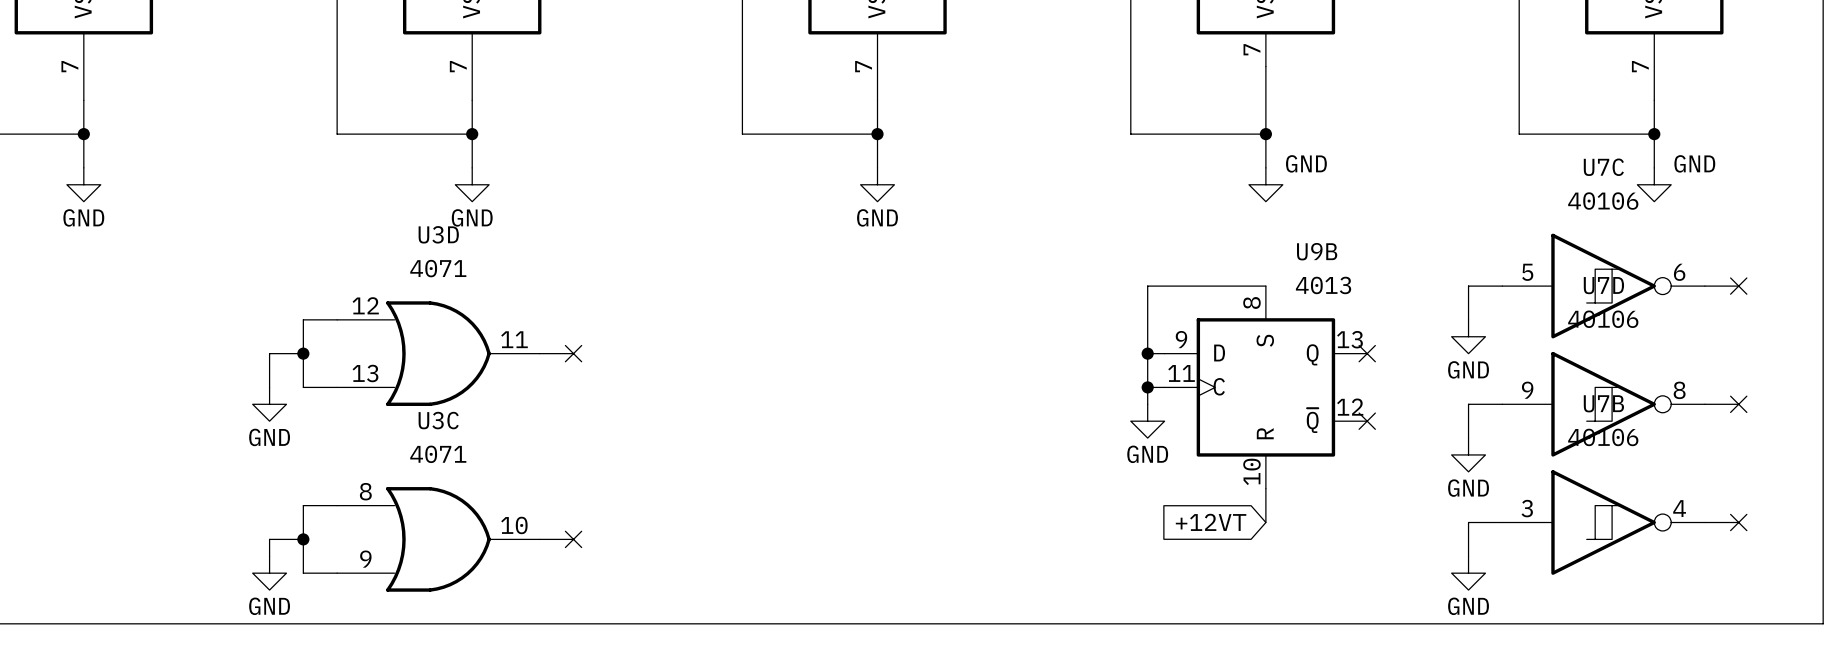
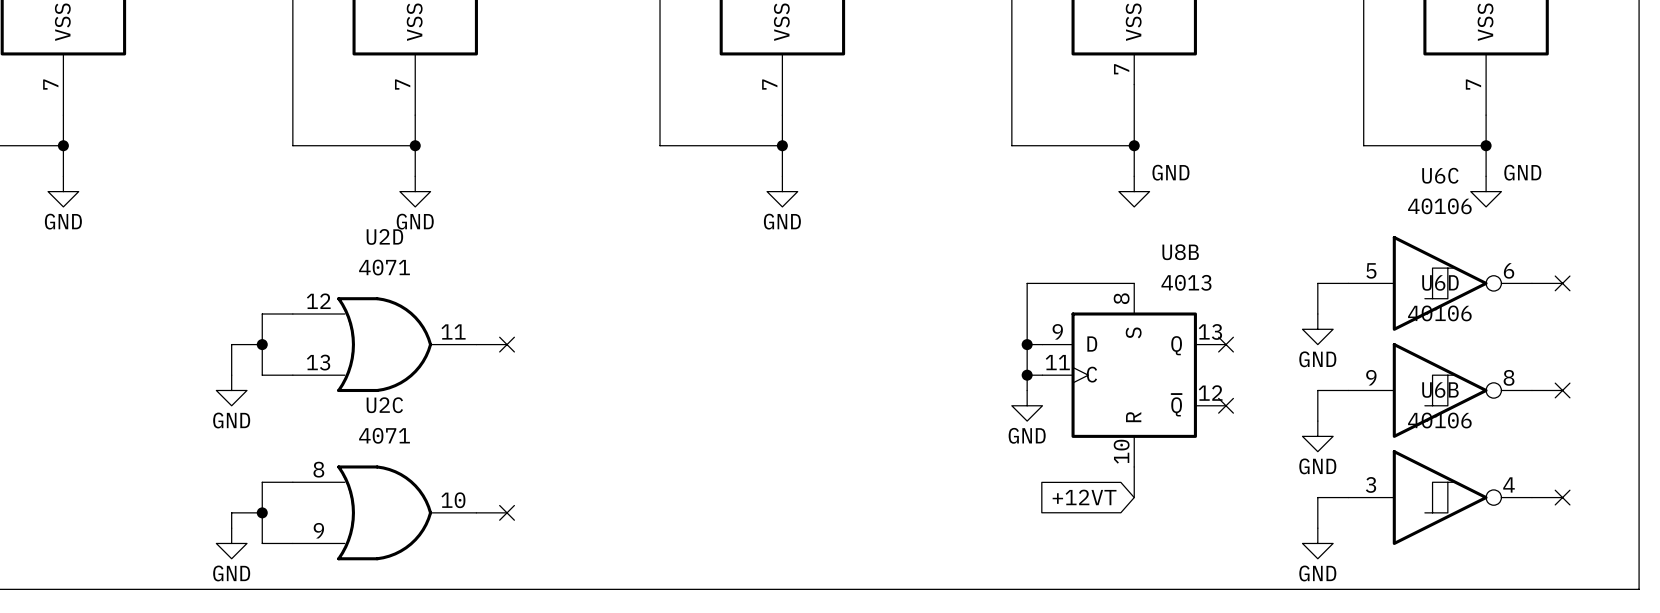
U7C name: U7C (1603, 167) -> U6C (1440, 175)
U3D name: U3D (438, 234) -> U2D (384, 236)
U9B name: U9B (1317, 251) -> U8B (1180, 252)
U7D name: U7D (1603, 285) -> U6D (1440, 282)
U7B name: U7B (1603, 403) -> U6B (1440, 390)
U3C name: U3C (438, 420) -> U2C (384, 405)

